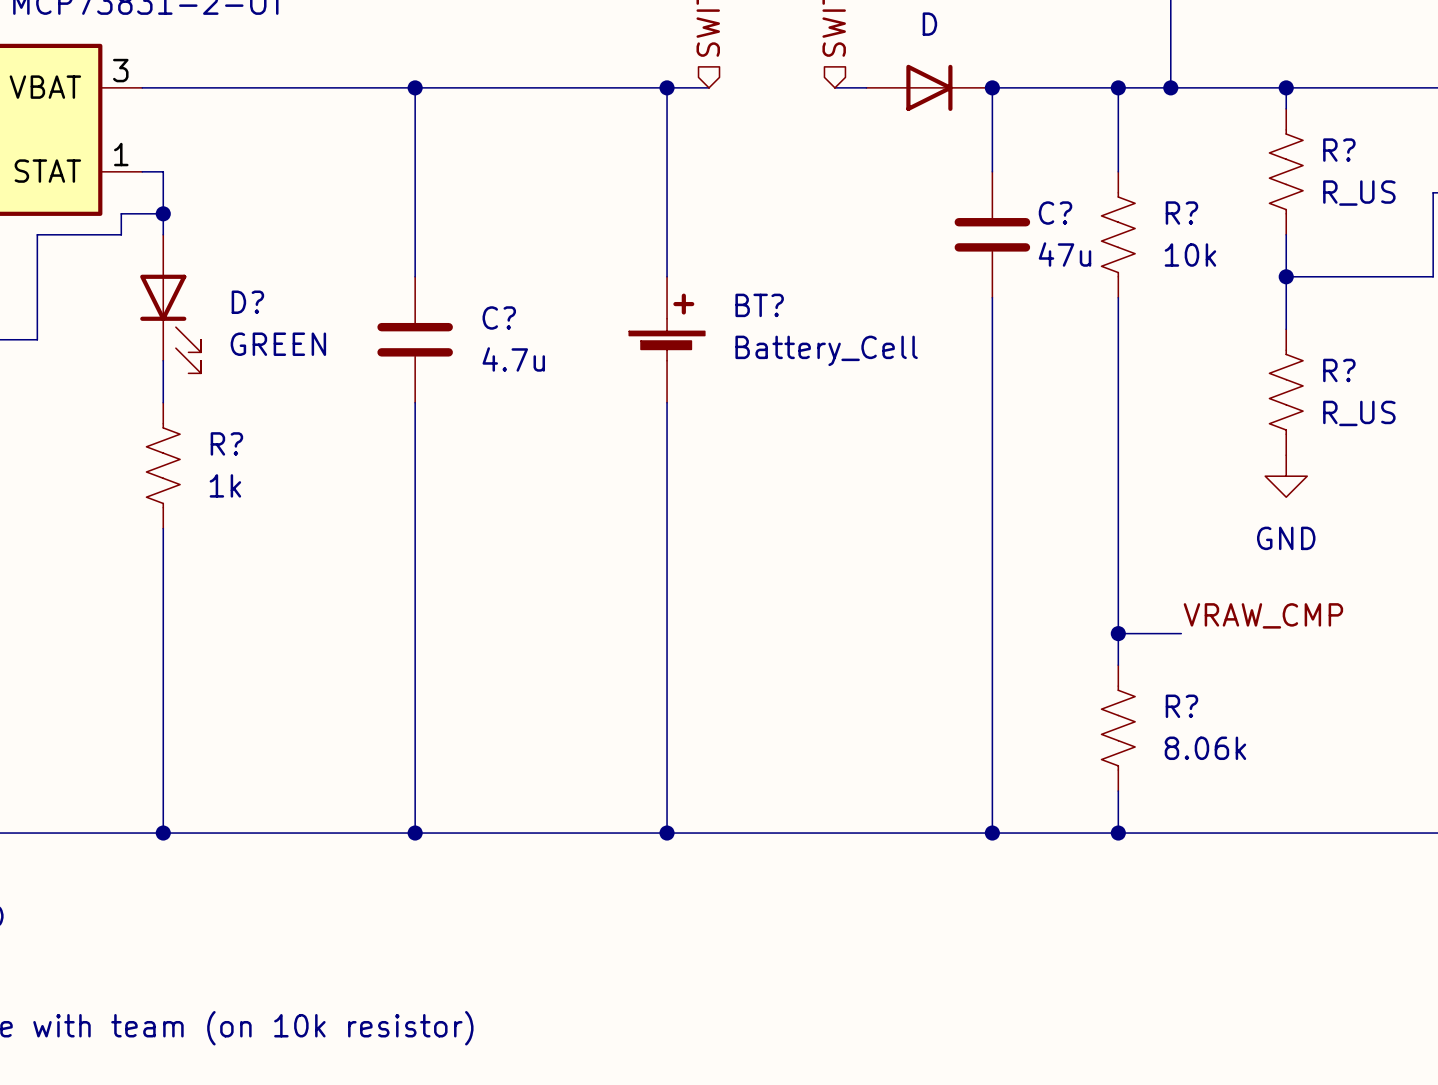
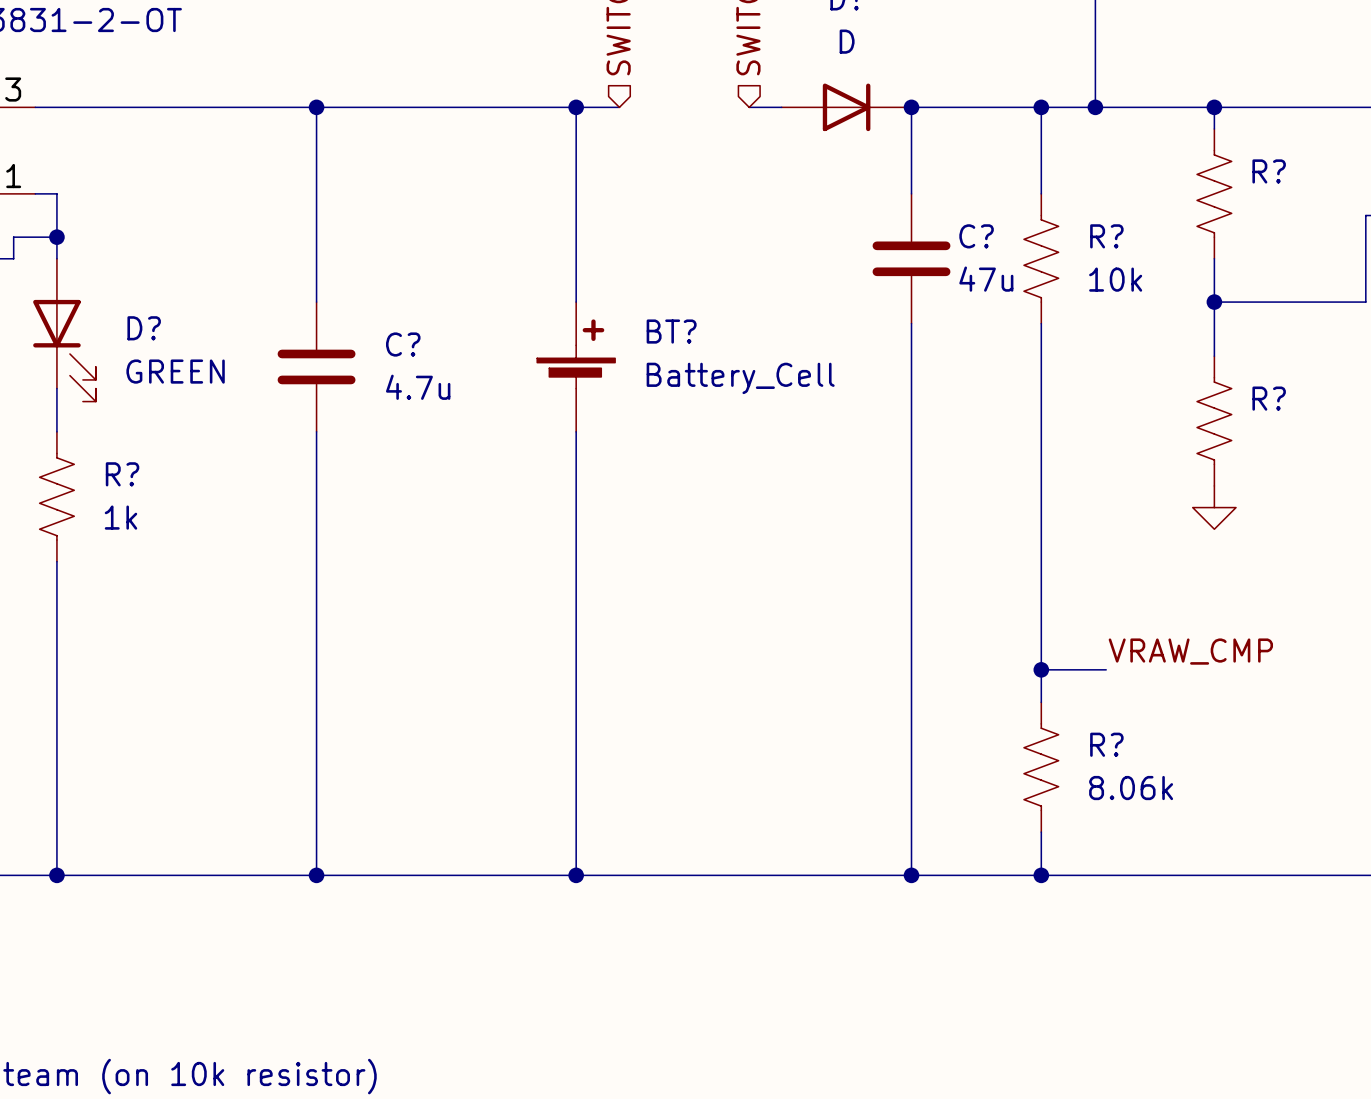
R? value: R_US (1359, 193) -> none
R? value: R_US (1359, 413) -> none
power symbol text: GND (1286, 538) -> none

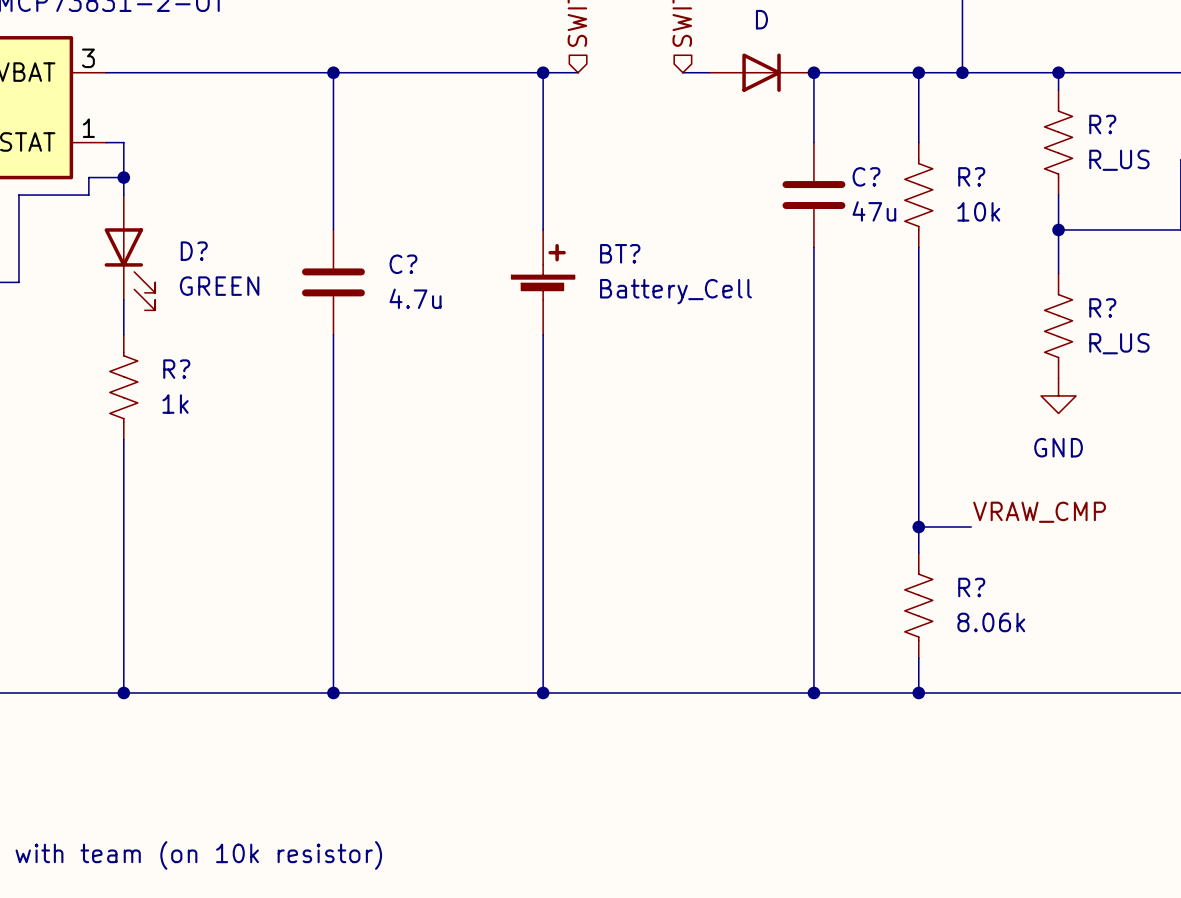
R? value: none -> R_US (1119, 160)
R? value: none -> R_US (1119, 343)
power symbol text: none -> GND (1058, 447)

